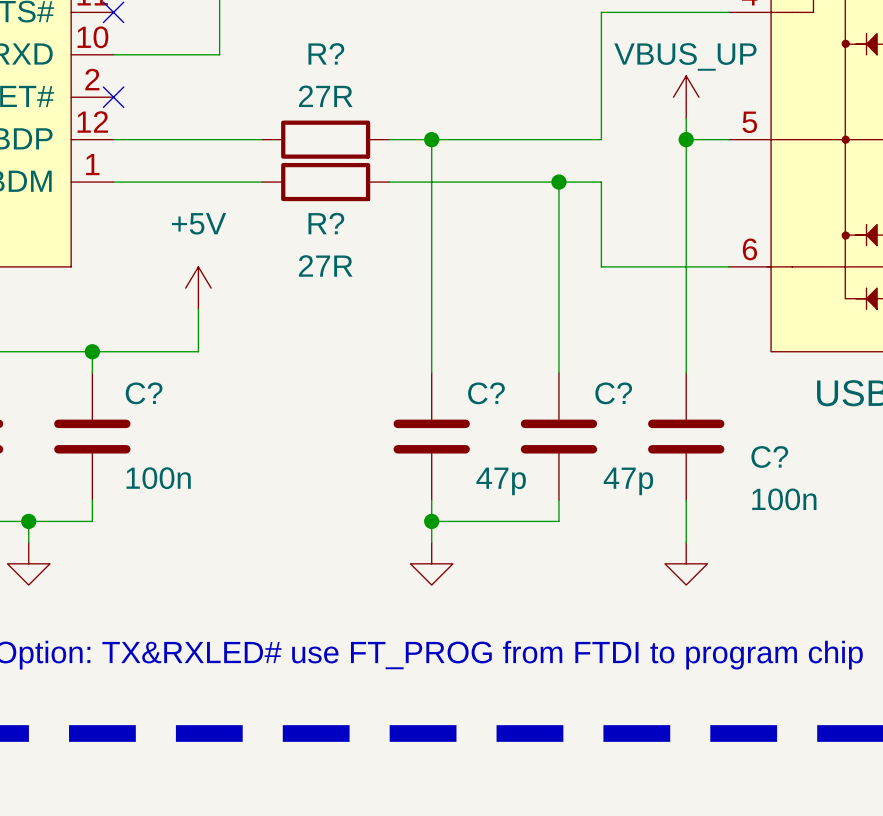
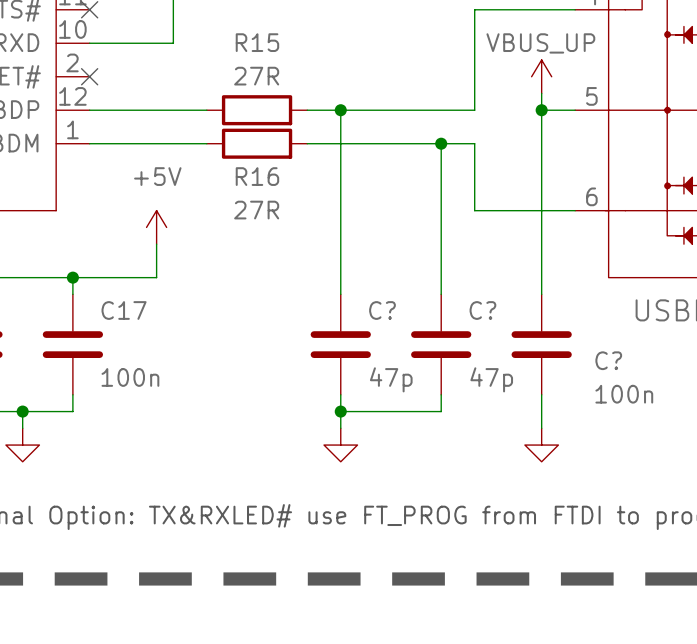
R? name: R? (326, 53) -> R15 (257, 42)
R? name: R? (326, 223) -> R16 (257, 176)
C? name: C? (144, 393) -> C17 (124, 310)

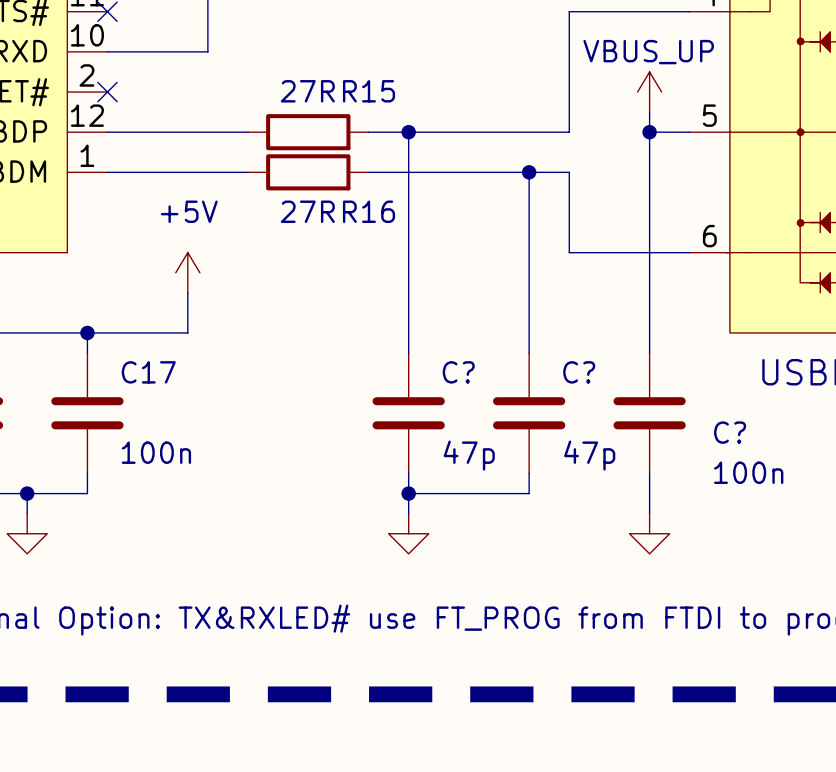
R15 name position: R15 (257, 42) -> R15 (368, 91)
R16 name position: R16 (257, 176) -> R16 (368, 211)
R16 value position: 27R (256, 210) -> 27R (307, 211)

